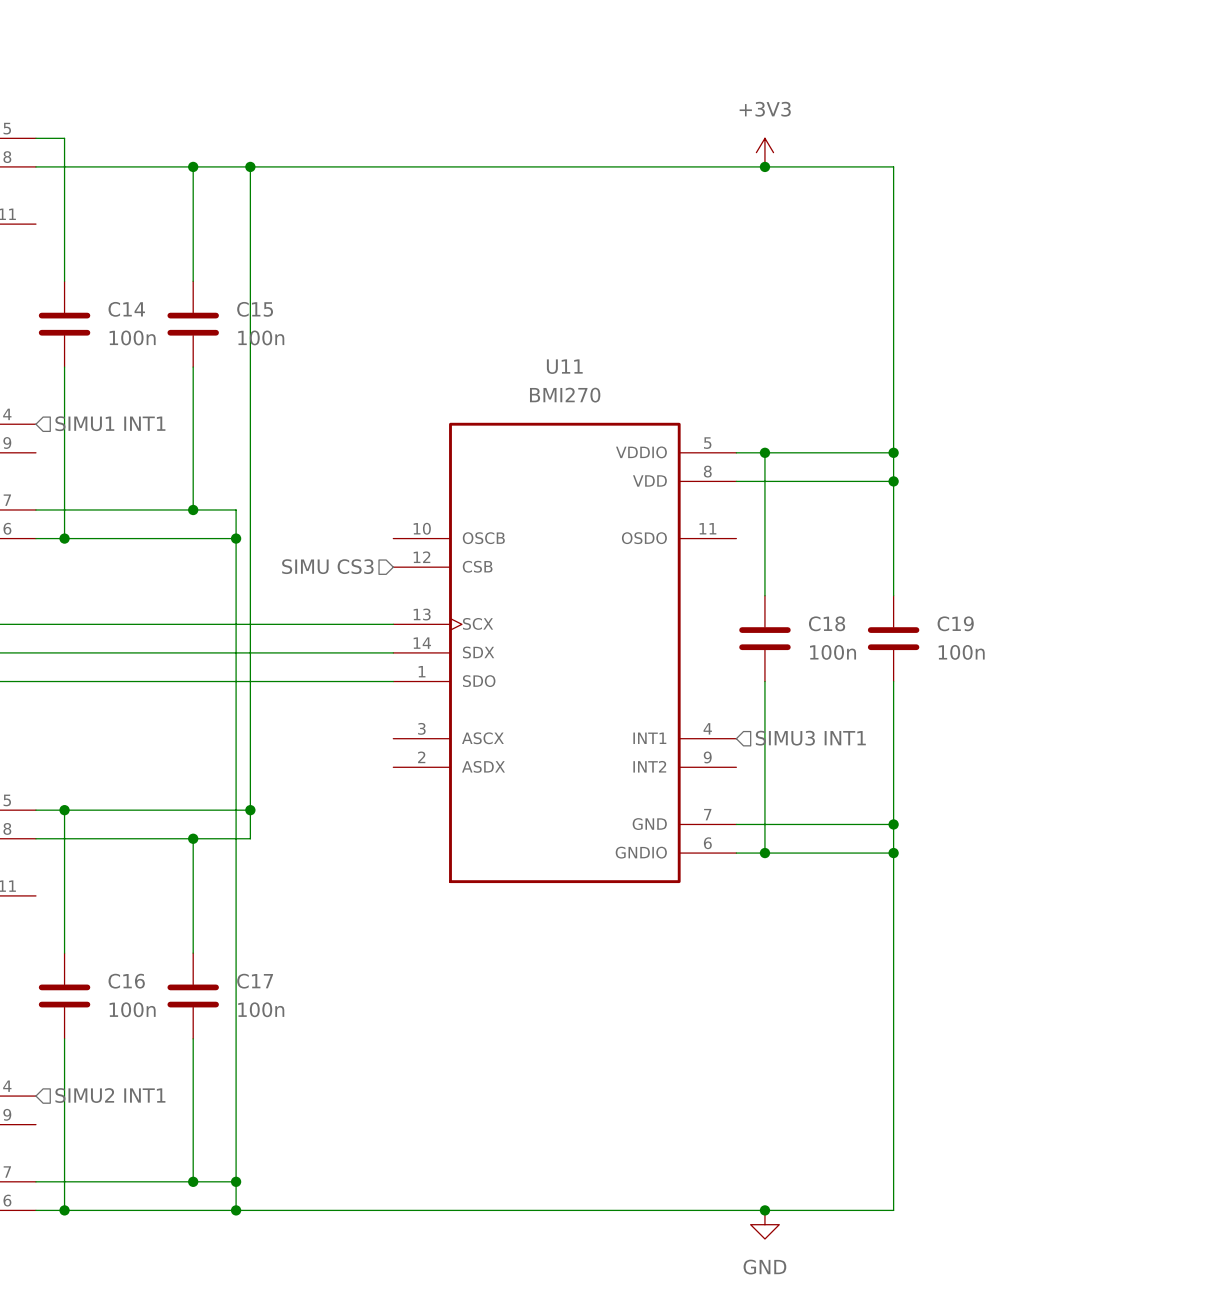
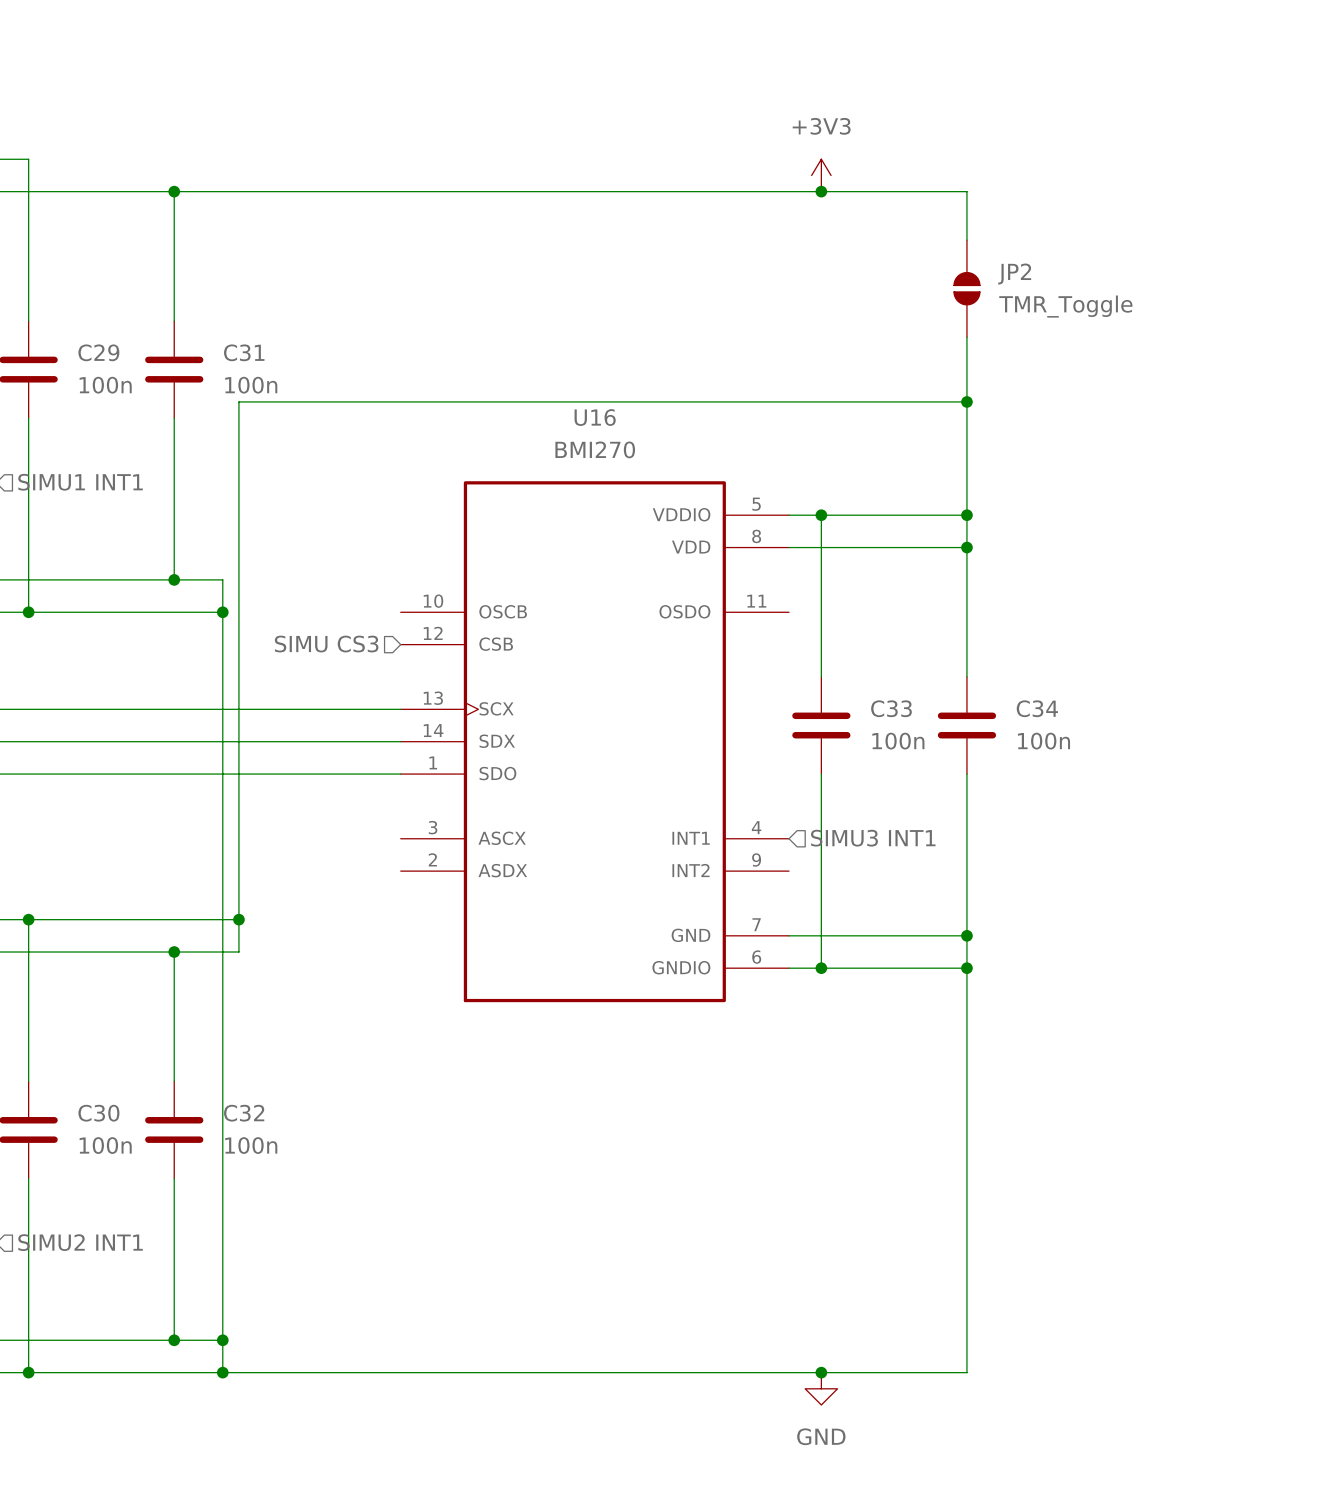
wire: (250, 166) (250, 352) -> (966, 401) (238, 401)
junction: (250, 166) -> none
JP2: none -> TMR_Toggle (966, 288)
C14 name: C14 (126, 309) -> C29 (98, 352)
C15 name: C15 (255, 309) -> C31 (244, 352)
junction: none -> (966, 401)
U11 name: U11 (564, 366) -> U16 (595, 417)
C18 name: C18 (827, 623) -> C33 (891, 708)
C19 name: C19 (955, 623) -> C34 (1037, 708)
C16 name: C16 (126, 981) -> C30 (98, 1113)
C17 name: C17 (255, 981) -> C32 (244, 1113)

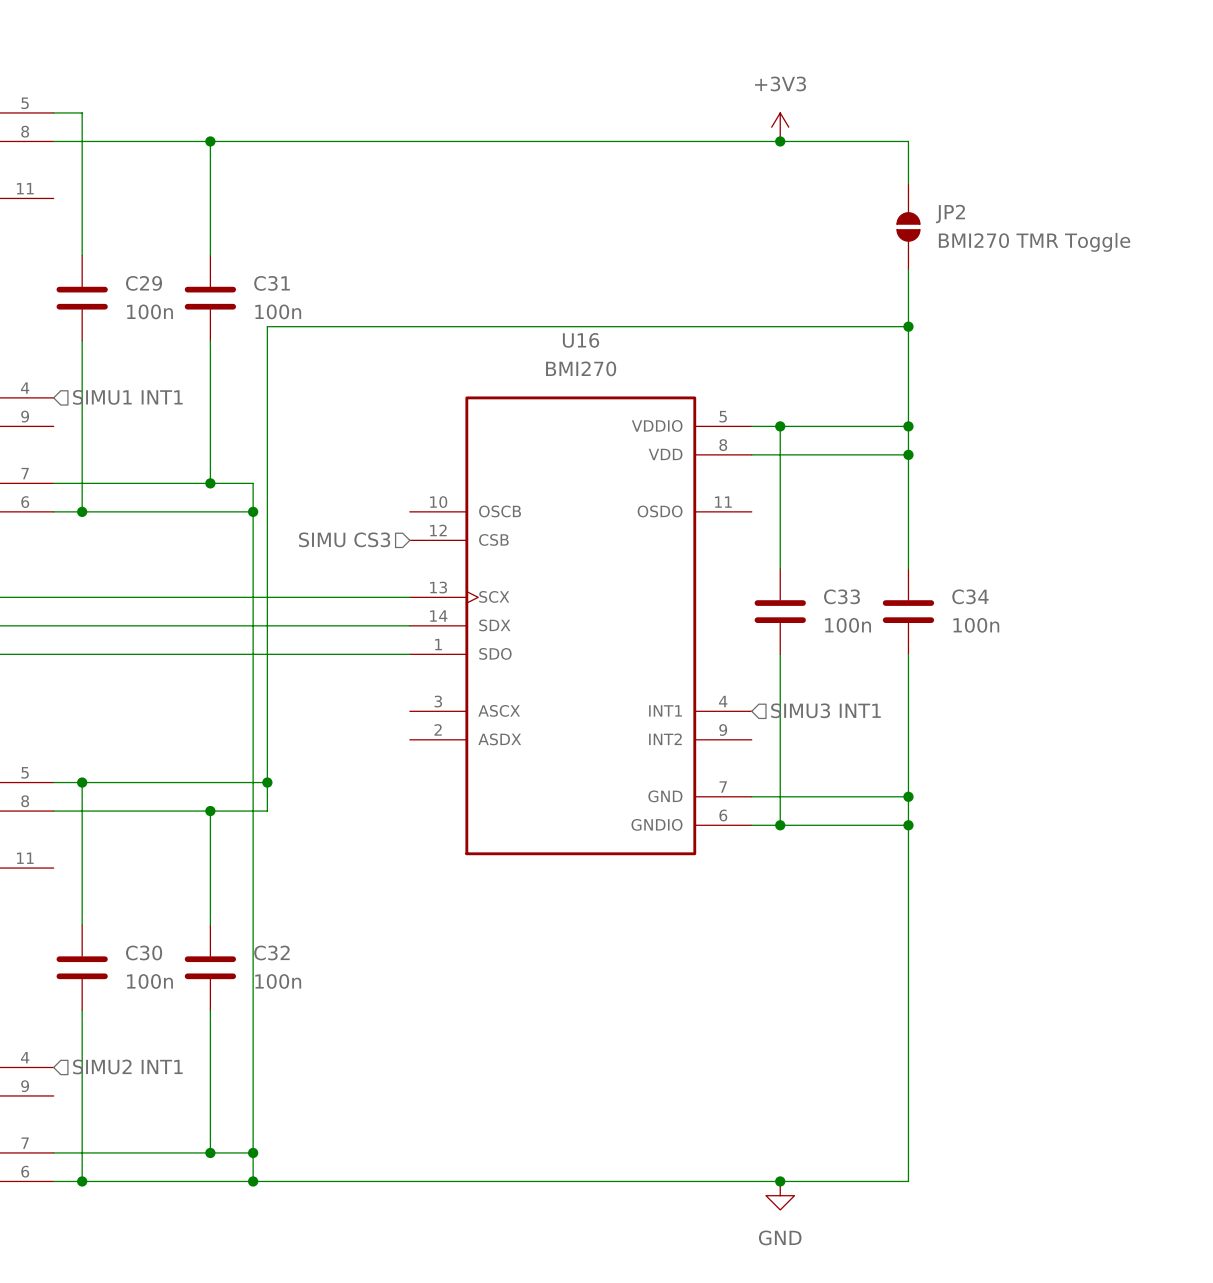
JP2 value: TMR_Toggle (1065, 306) -> BMI270 TMR Toggle (1034, 242)

